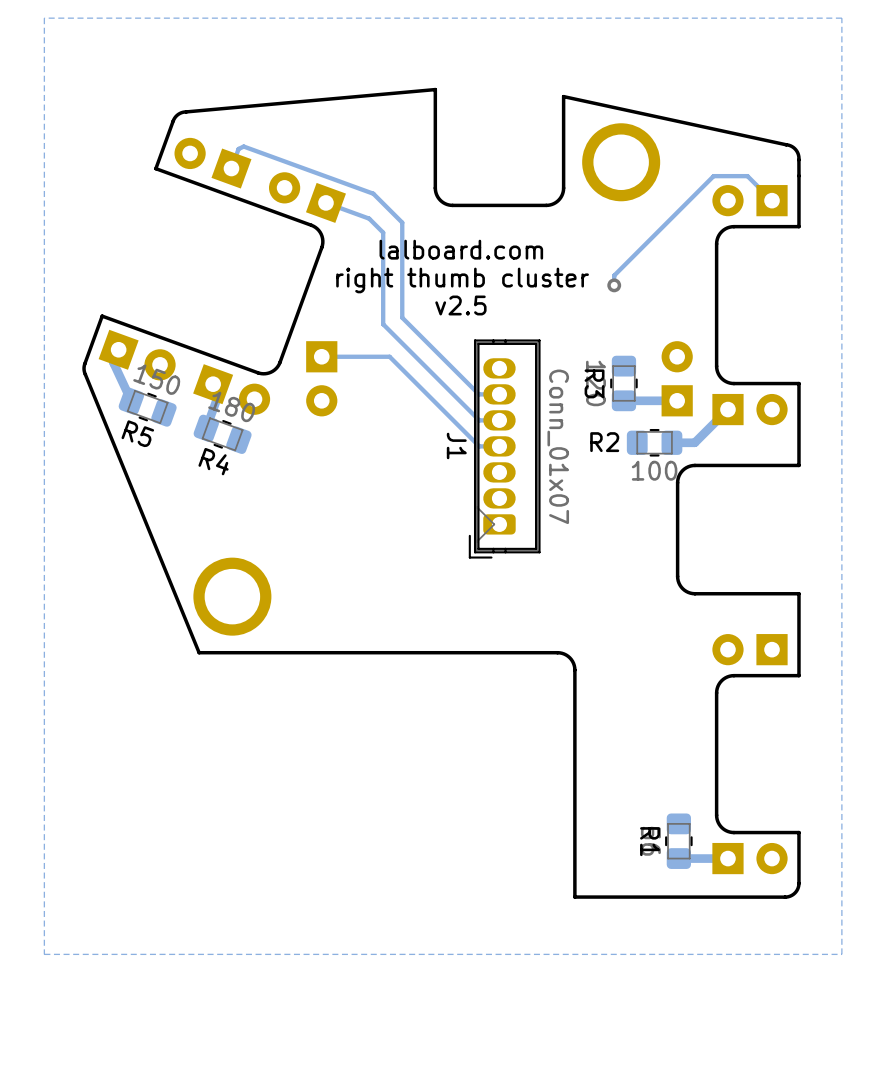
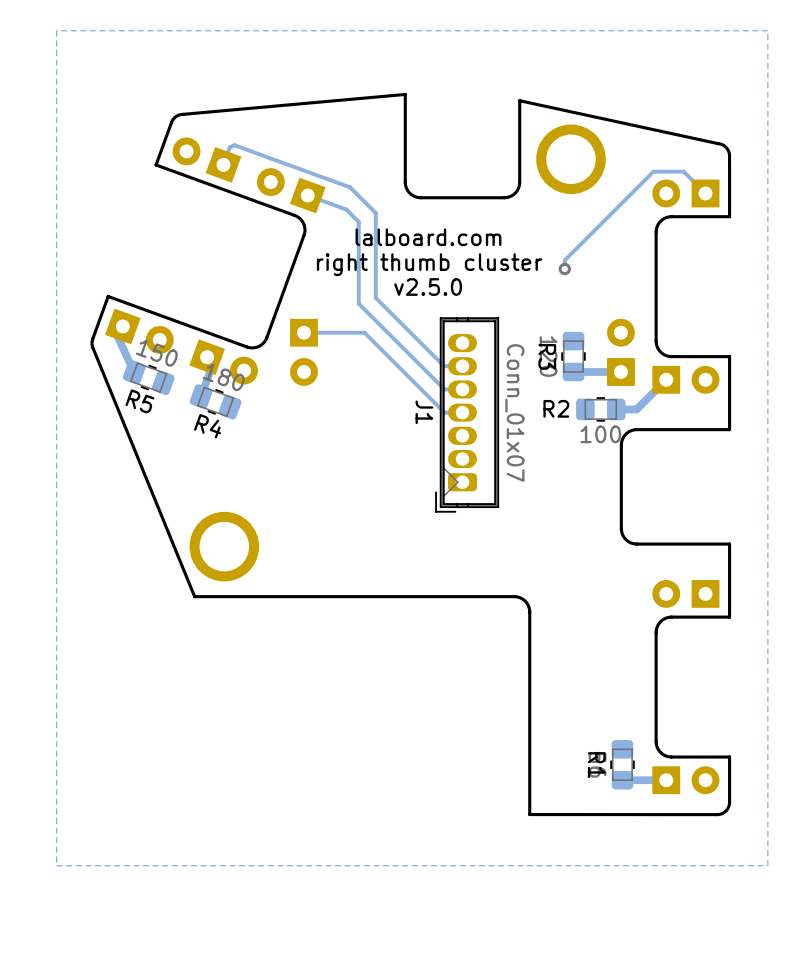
text: v2.5 (460, 305) -> v2.5.0 (428, 286)

